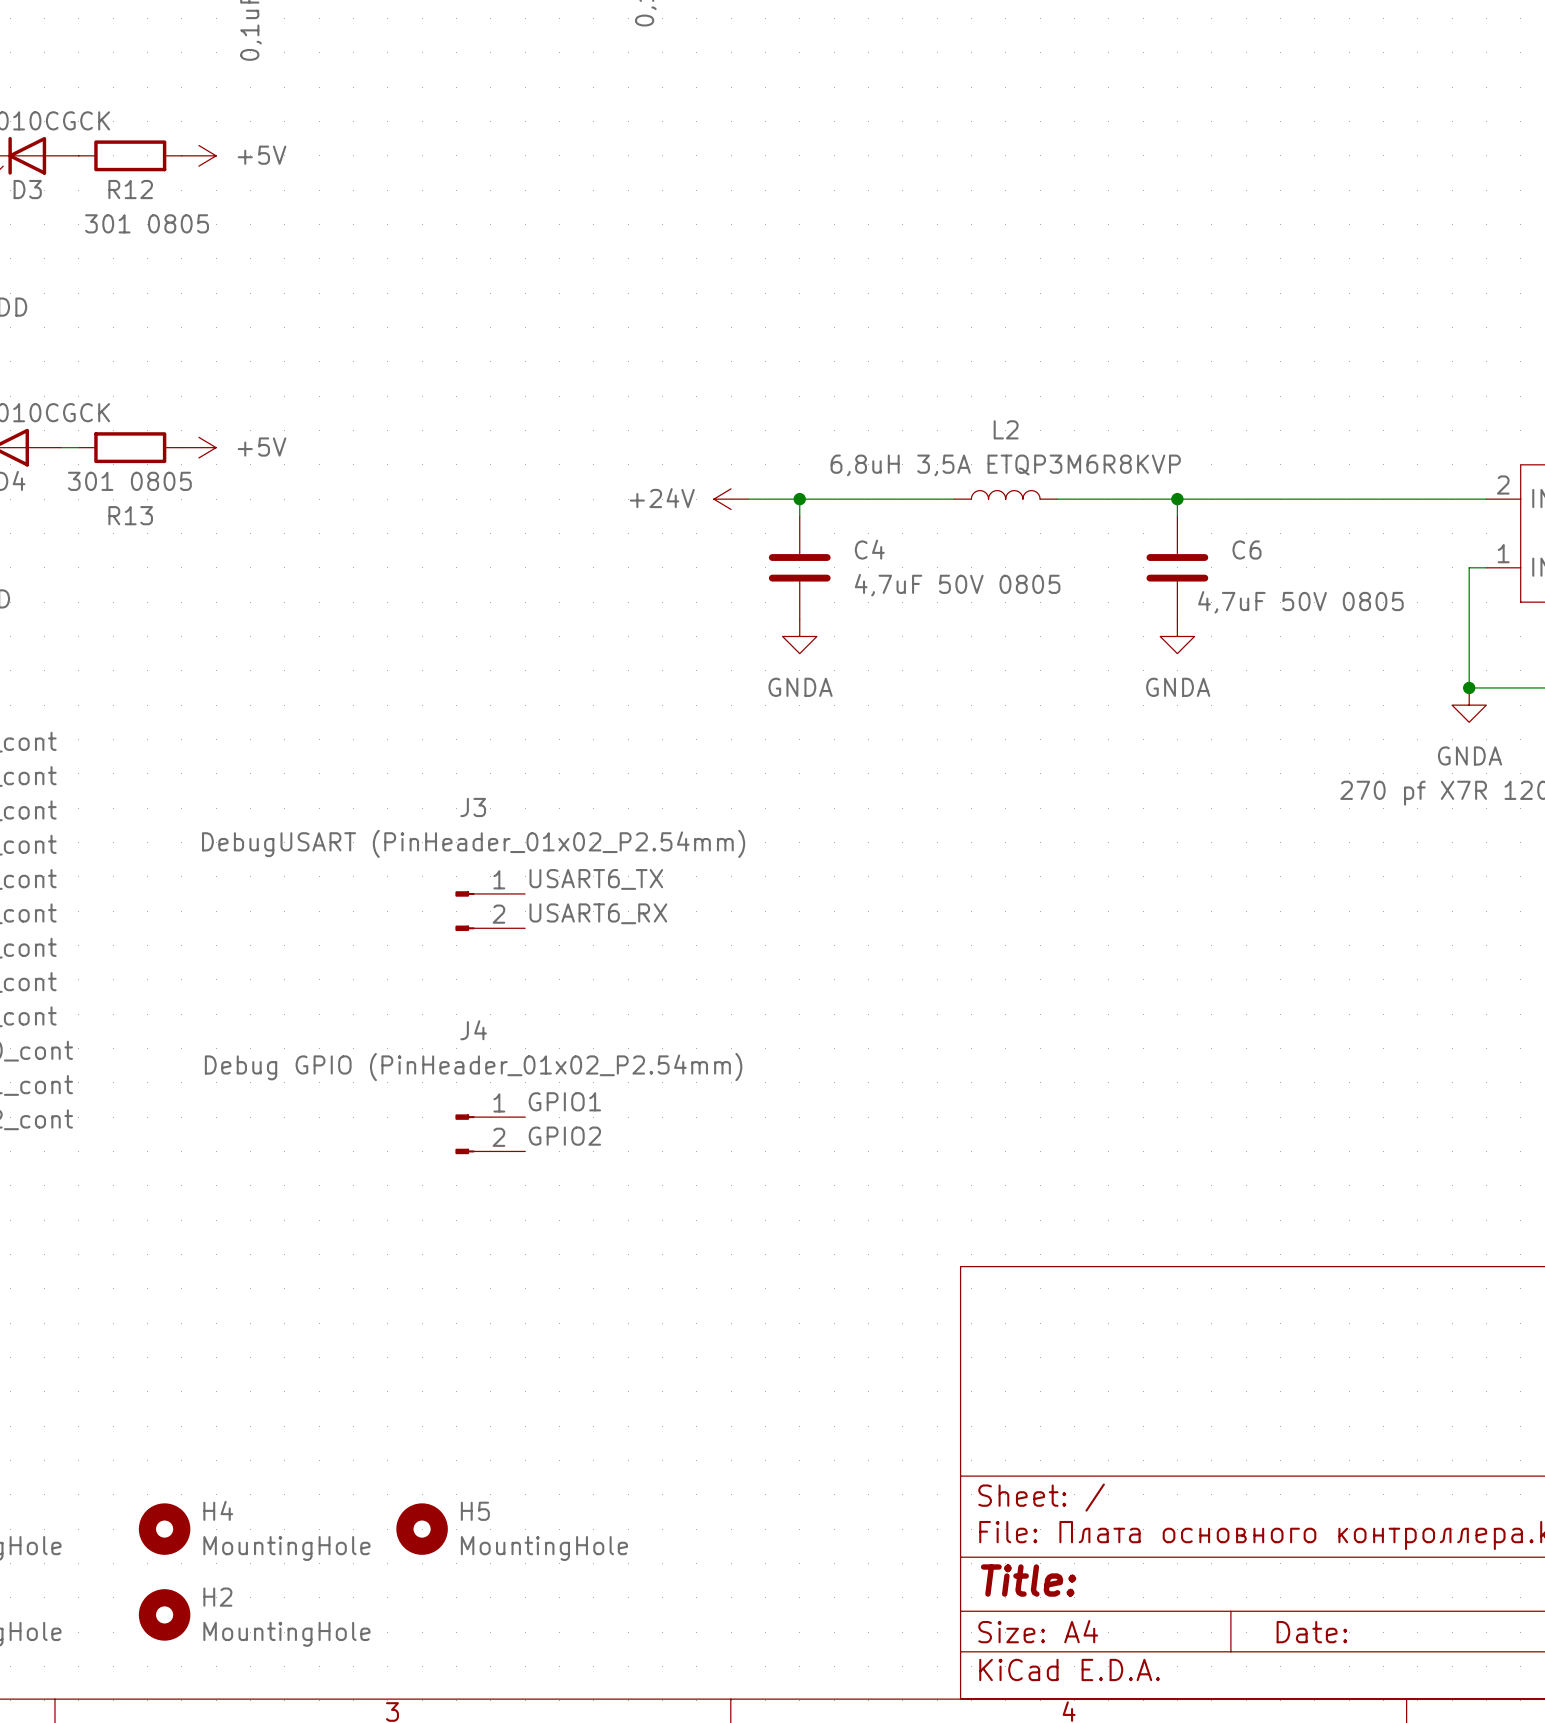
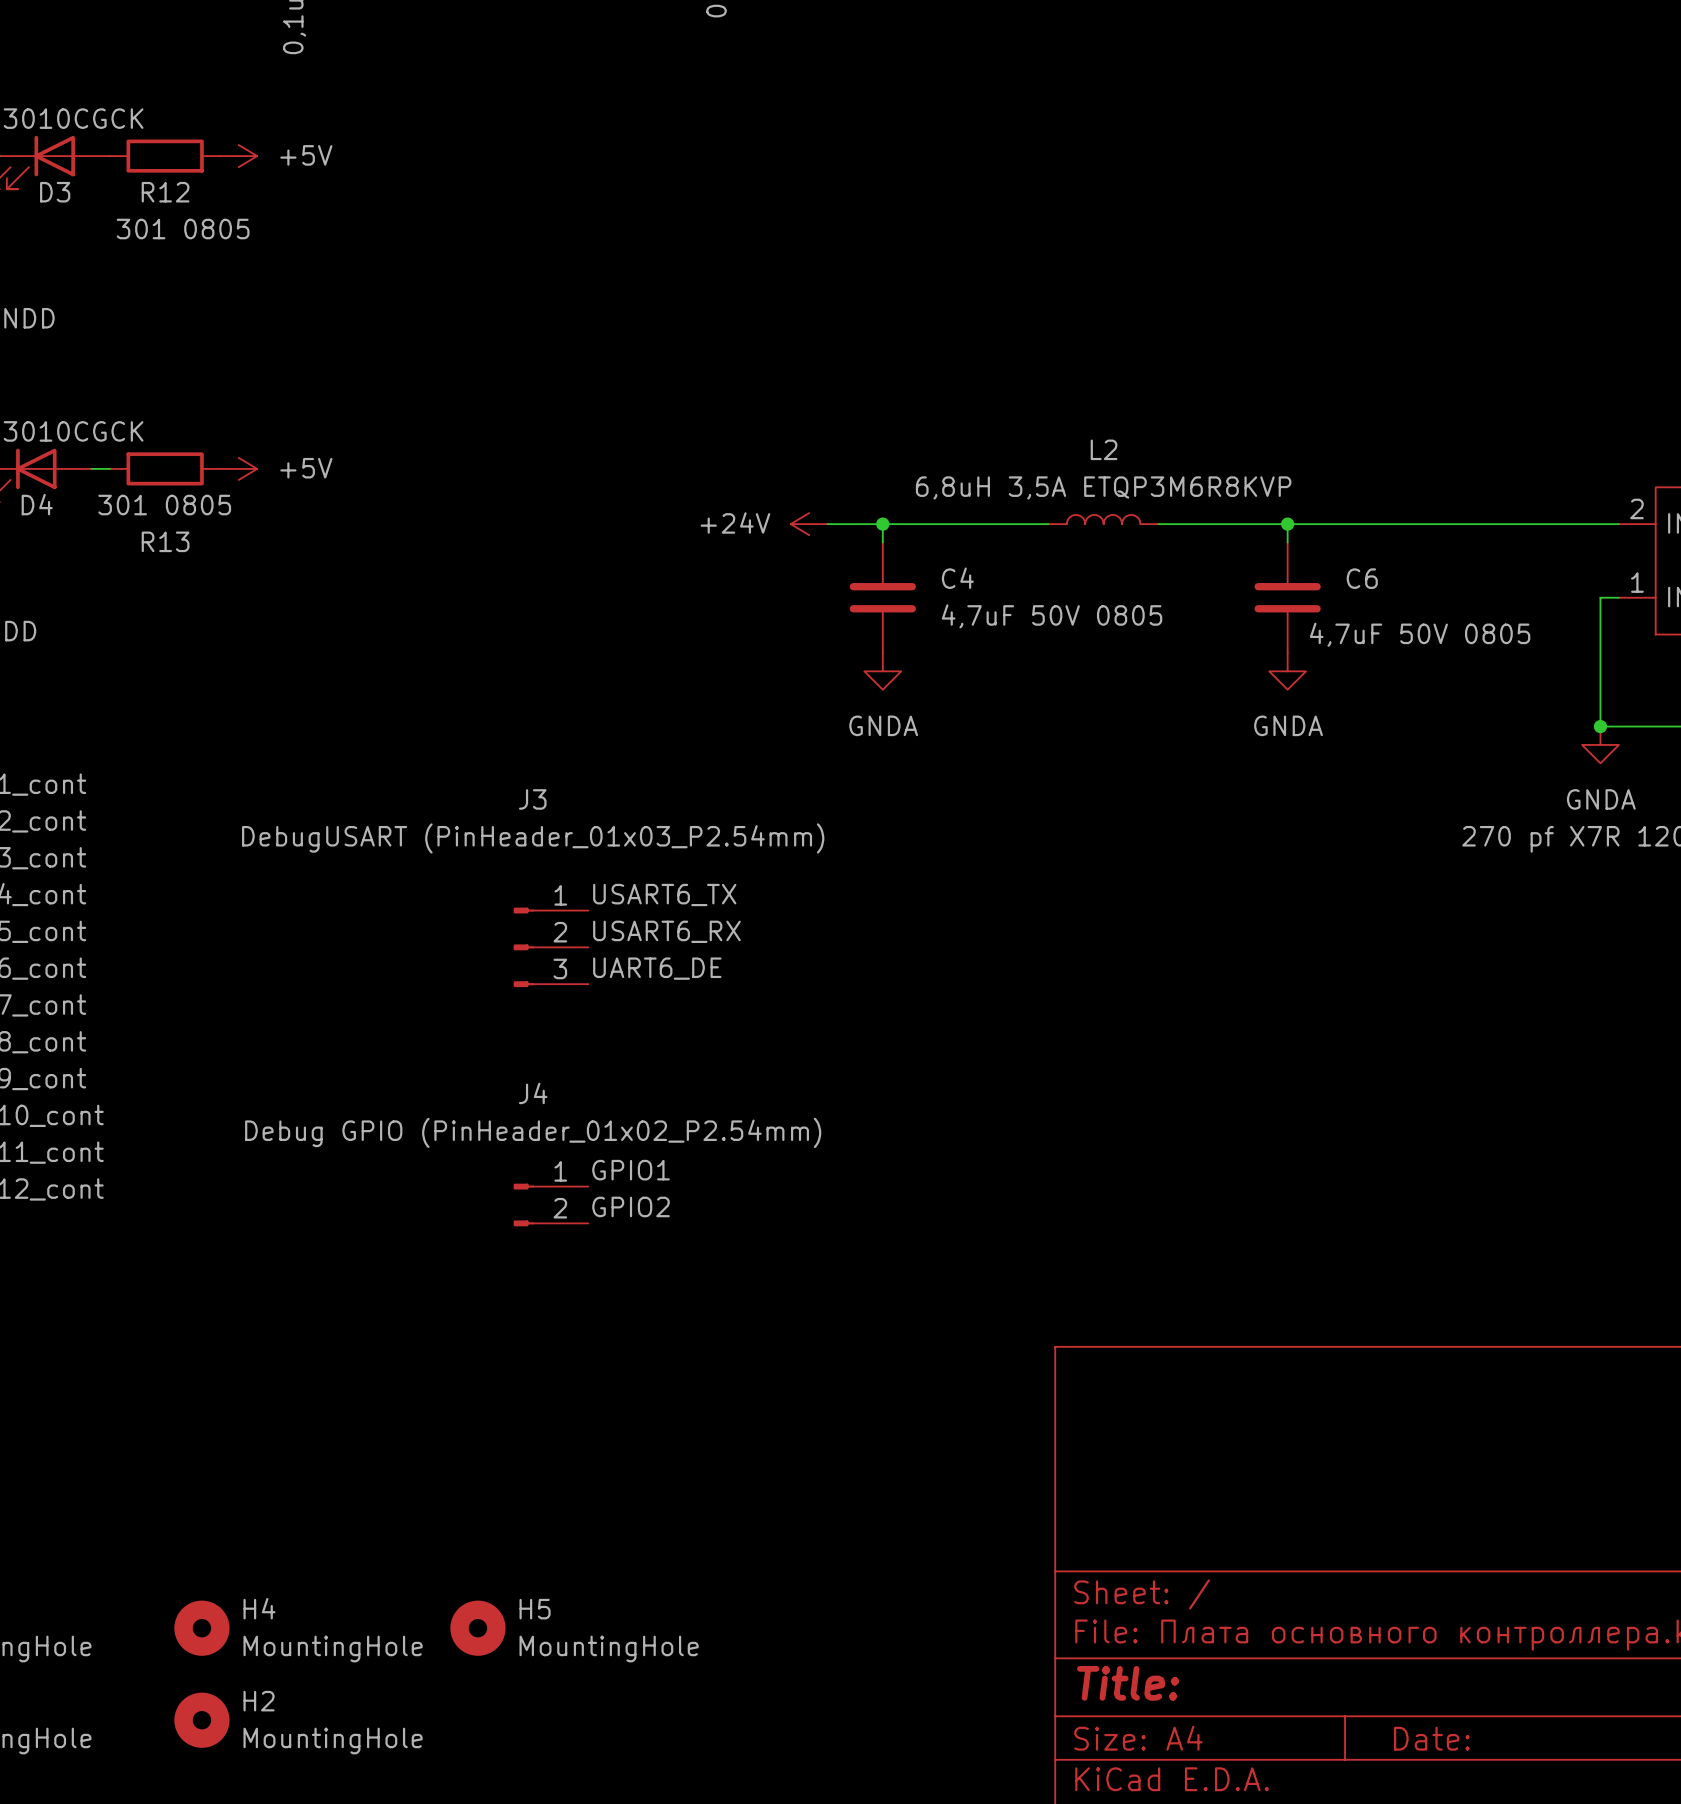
J3 name position: J3 (473, 807) -> J3 (532, 799)
J3 value: DebugUSART (PinHeader_01x02_P2.54mm) (473, 843) -> DebugUSART (PinHeader_01x03_P2.54mm) (533, 838)
label: none -> USART6_TX (664, 895)
label: USART6_TX (596, 879) -> USART6_RX (666, 931)
J3 symbol: [455, 891, 526, 932] -> [513, 907, 589, 988]
label: USART6_RX (598, 913) -> UART6_DE (657, 968)

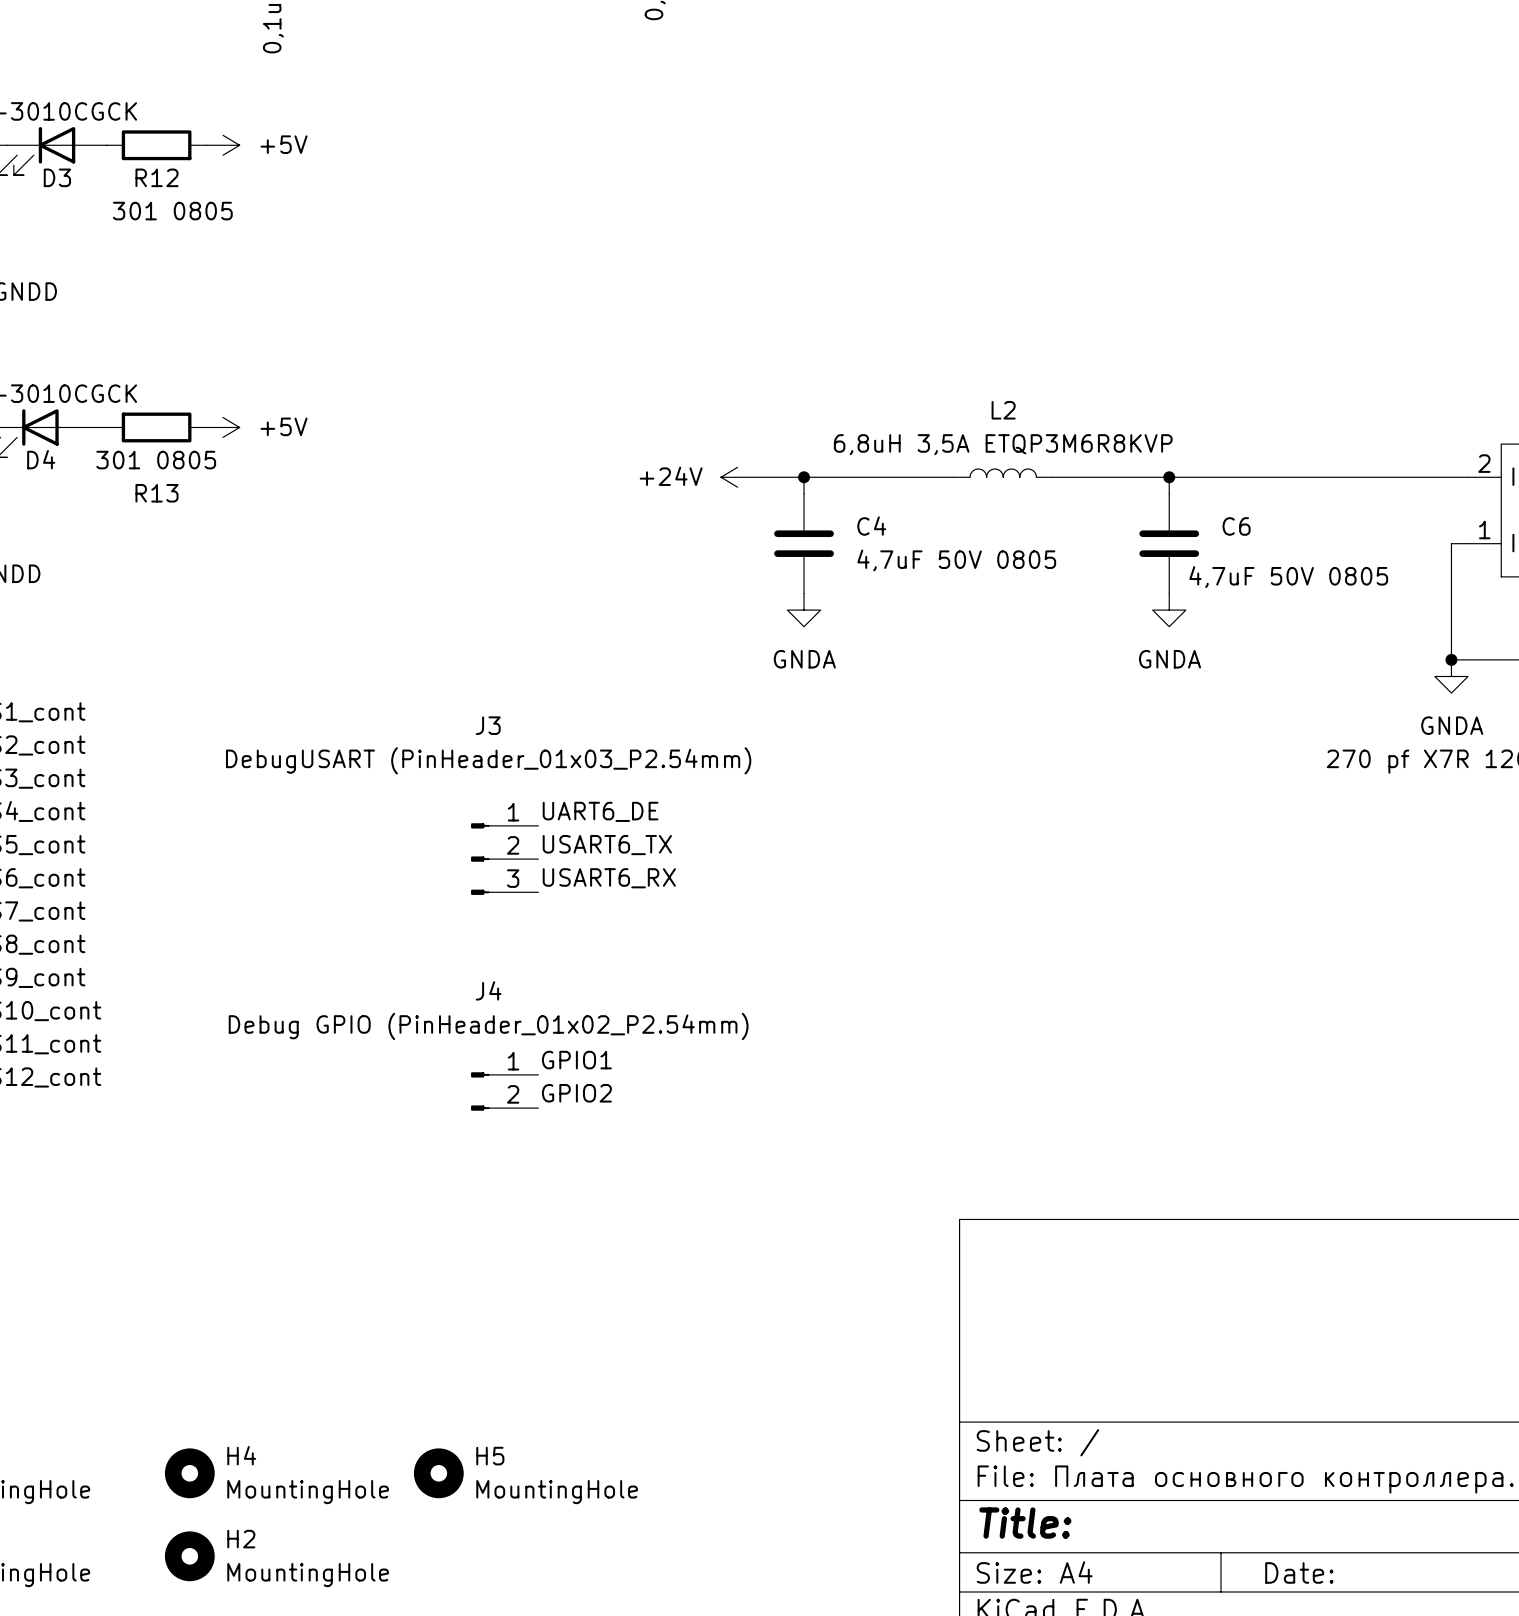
label: USART6_TX (664, 895) -> UART6_DE (600, 811)
label: USART6_RX (666, 931) -> USART6_TX (607, 845)
label: UART6_DE (657, 968) -> USART6_RX (609, 878)

